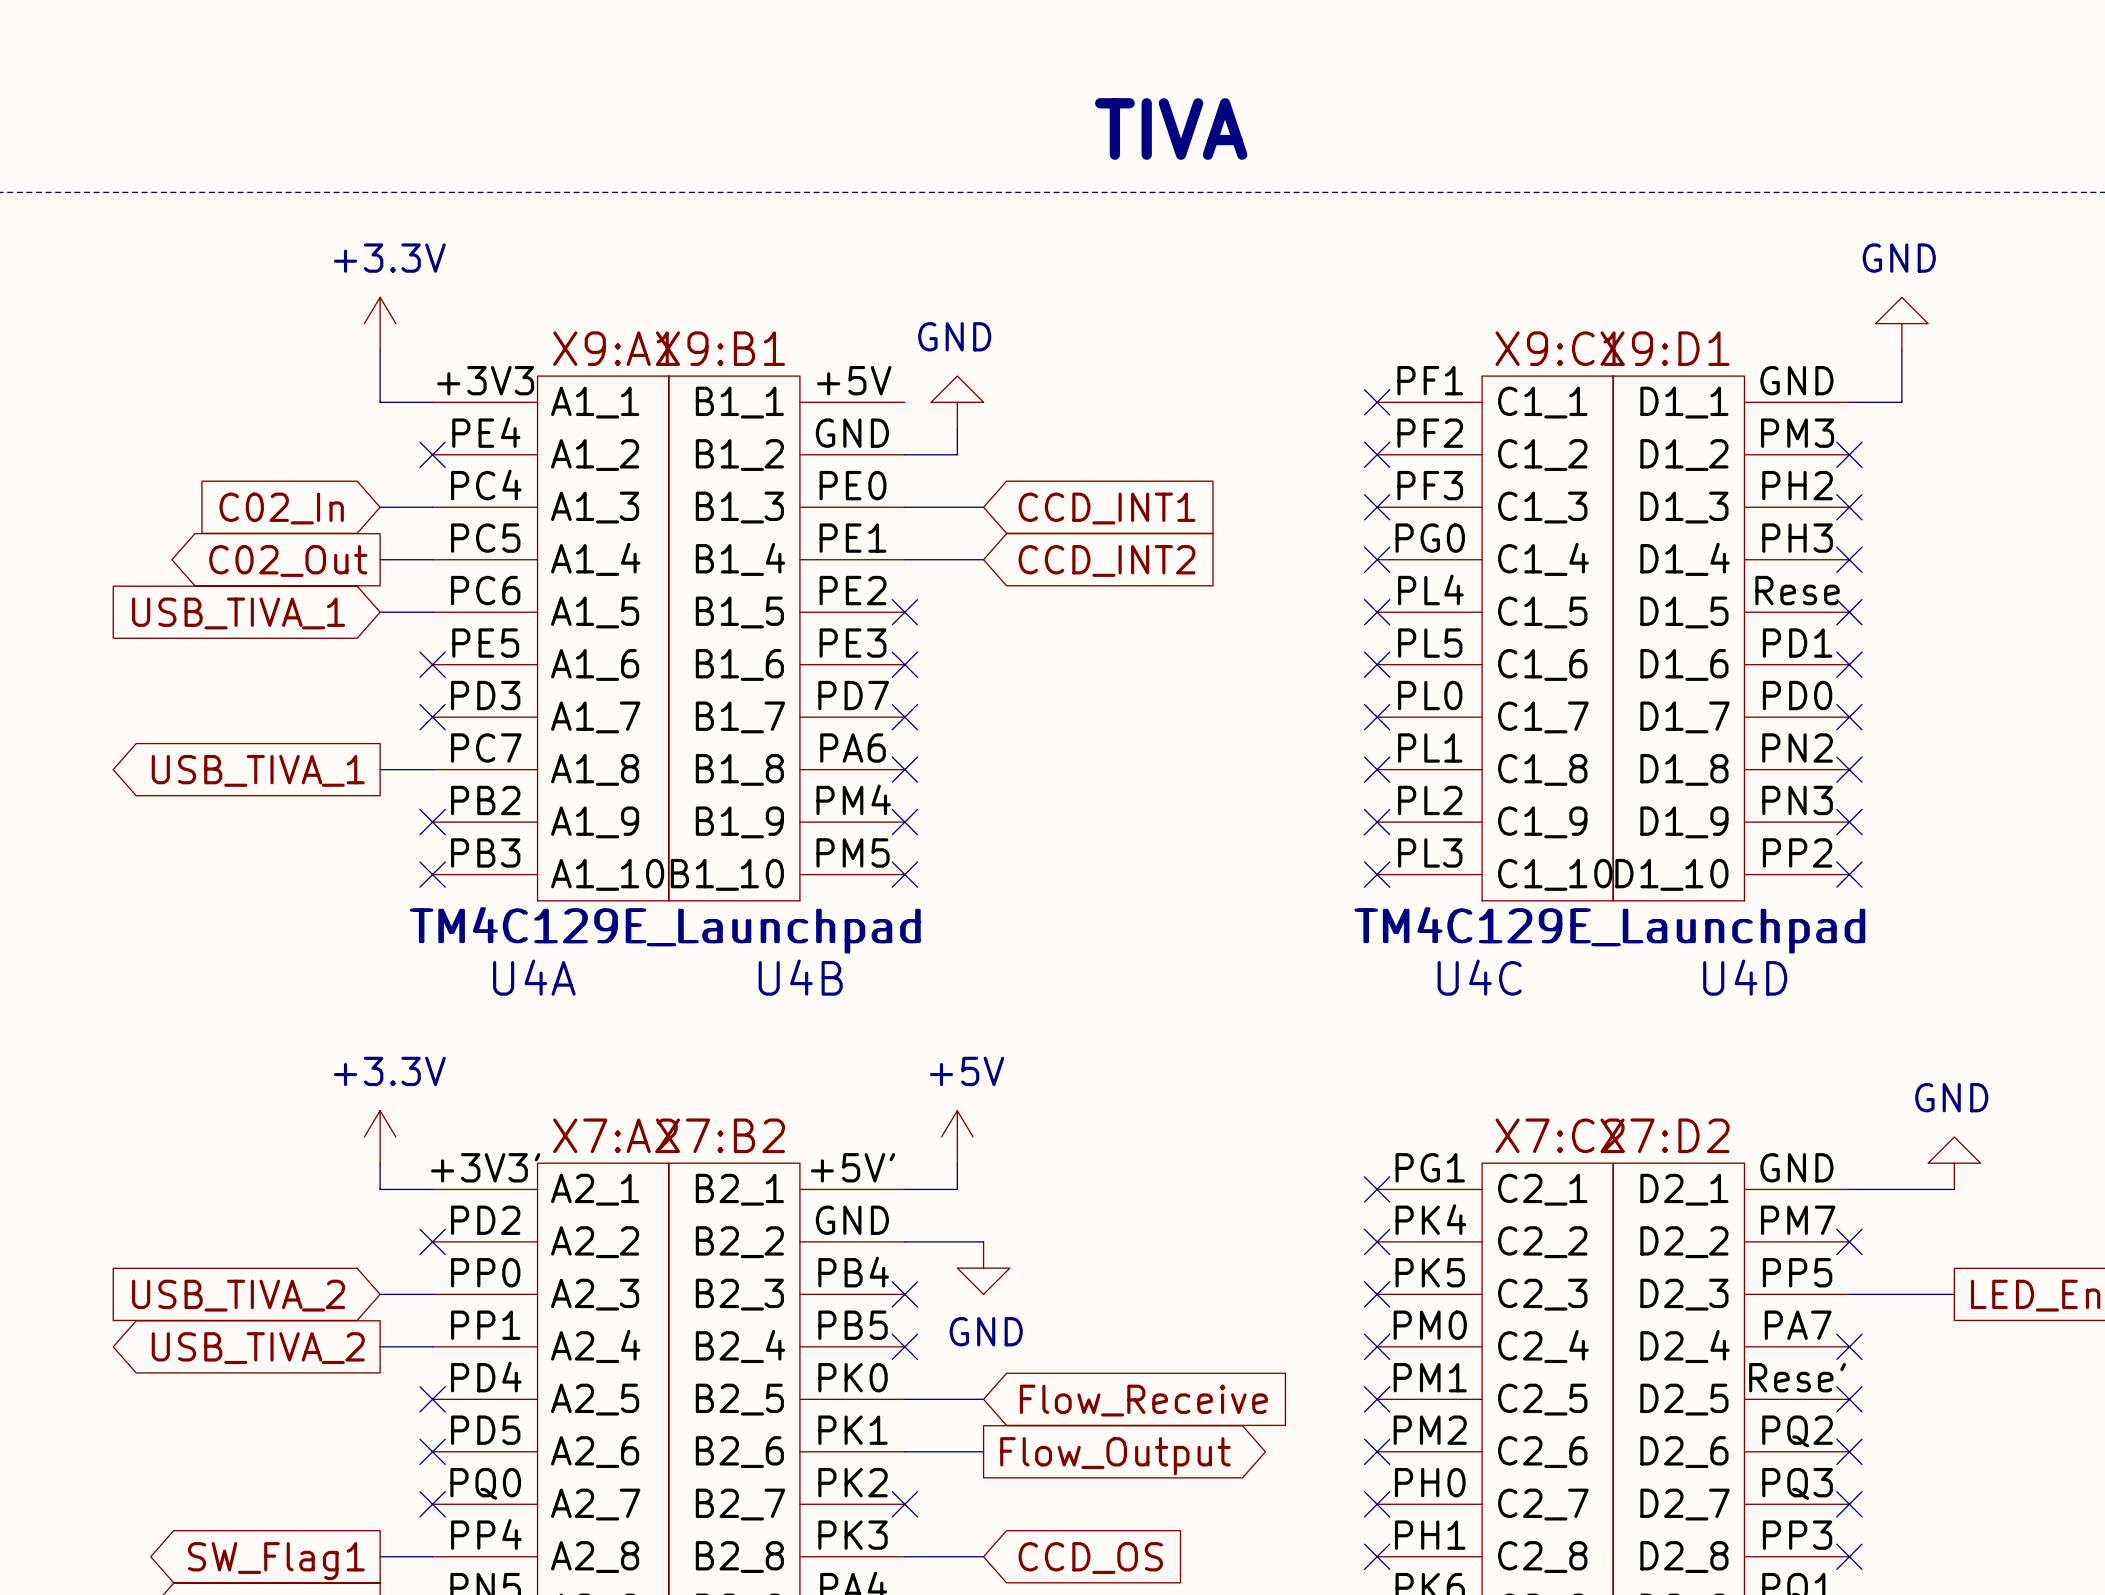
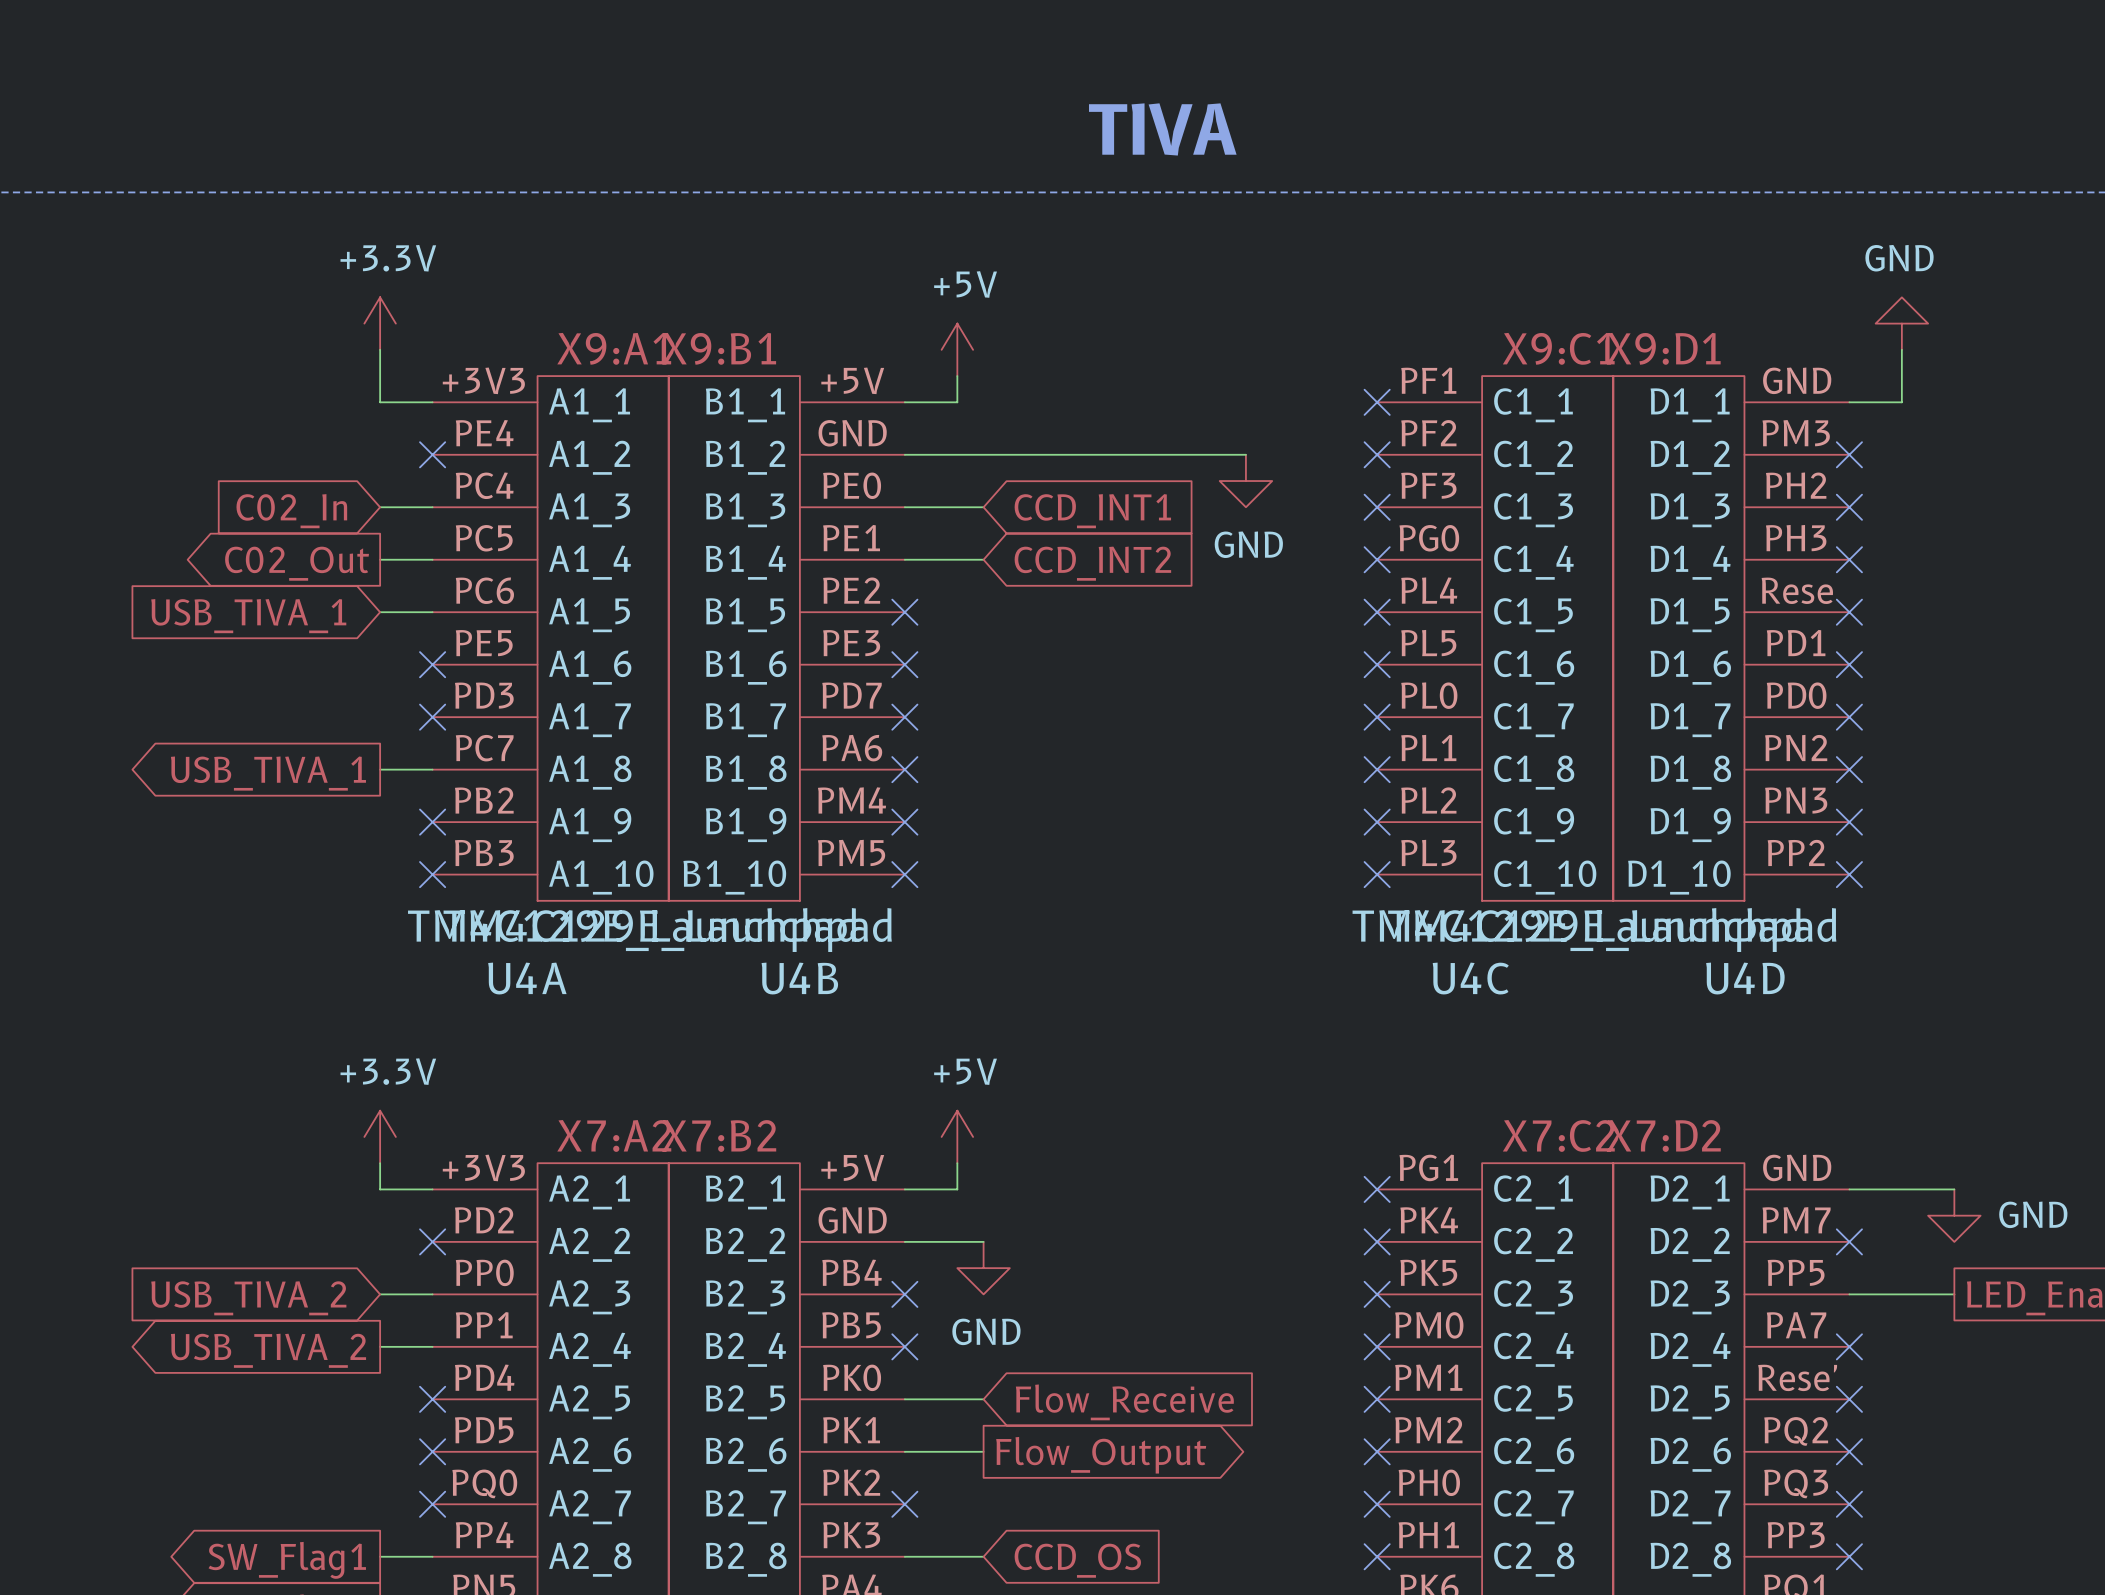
power symbol: none -> +5V (957, 349)
wire: none -> (957, 376) (957, 402) (904, 402)
power symbol rotation: 0° (957, 402) -> 180° (1245, 481)
power symbol position: GND (957, 402) -> GND (1245, 481)
wire: (957, 428) (957, 454) -> (1245, 454) (957, 454)
power symbol text position: GND (1951, 1097) -> GND (2033, 1214)
power symbol rotation: 0° (1954, 1163) -> 180° (1954, 1215)
power symbol position: GND (1954, 1163) -> GND (1954, 1215)
part pin number: +3V3' (485, 1167) -> +3V3 (483, 1167)
part pin number: +5V' (853, 1167) -> +5V (852, 1167)

